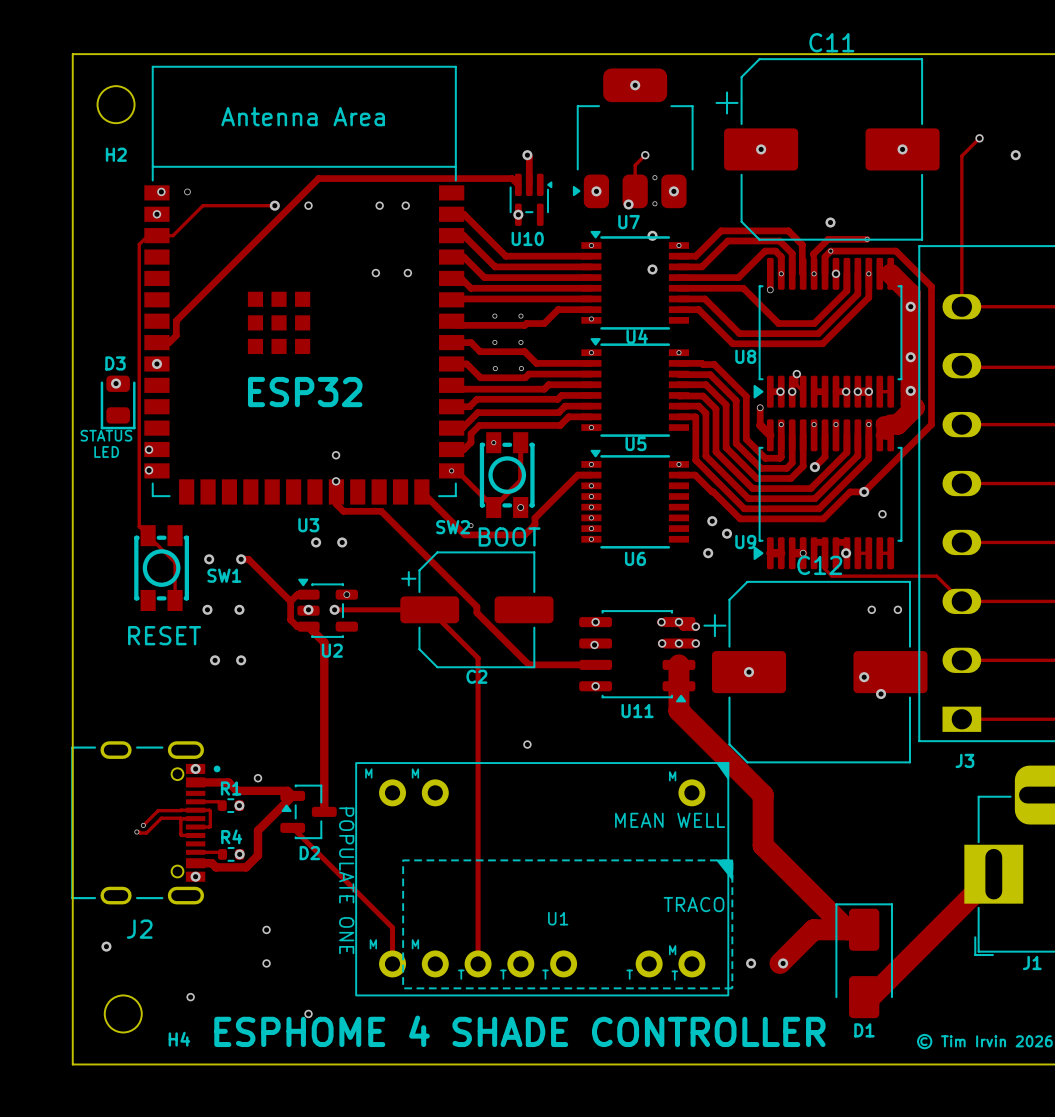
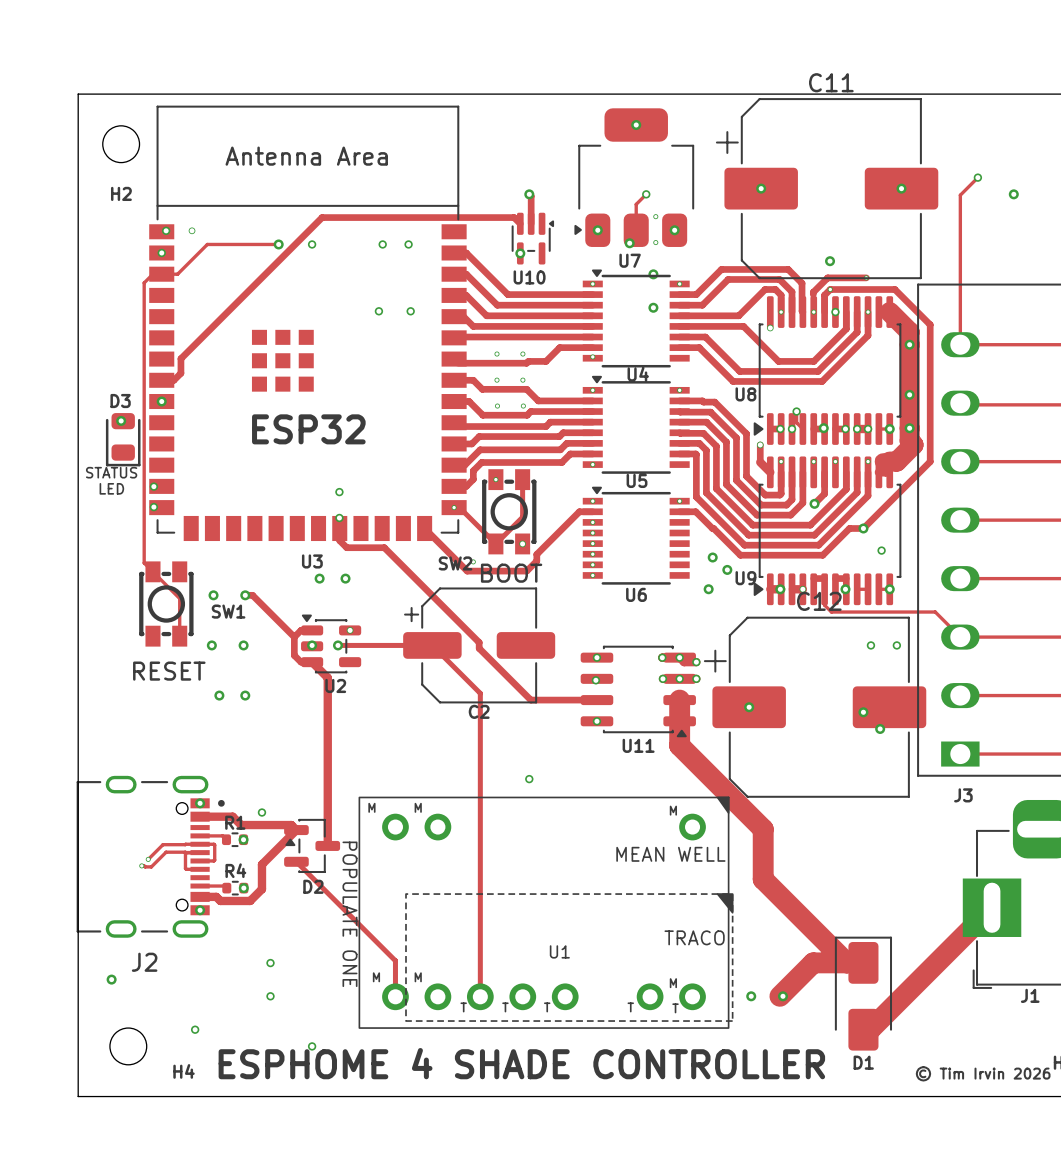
via: none -> (823, 428)
via: none -> (889, 429)
via: none -> (780, 589)
via: none -> (889, 589)

